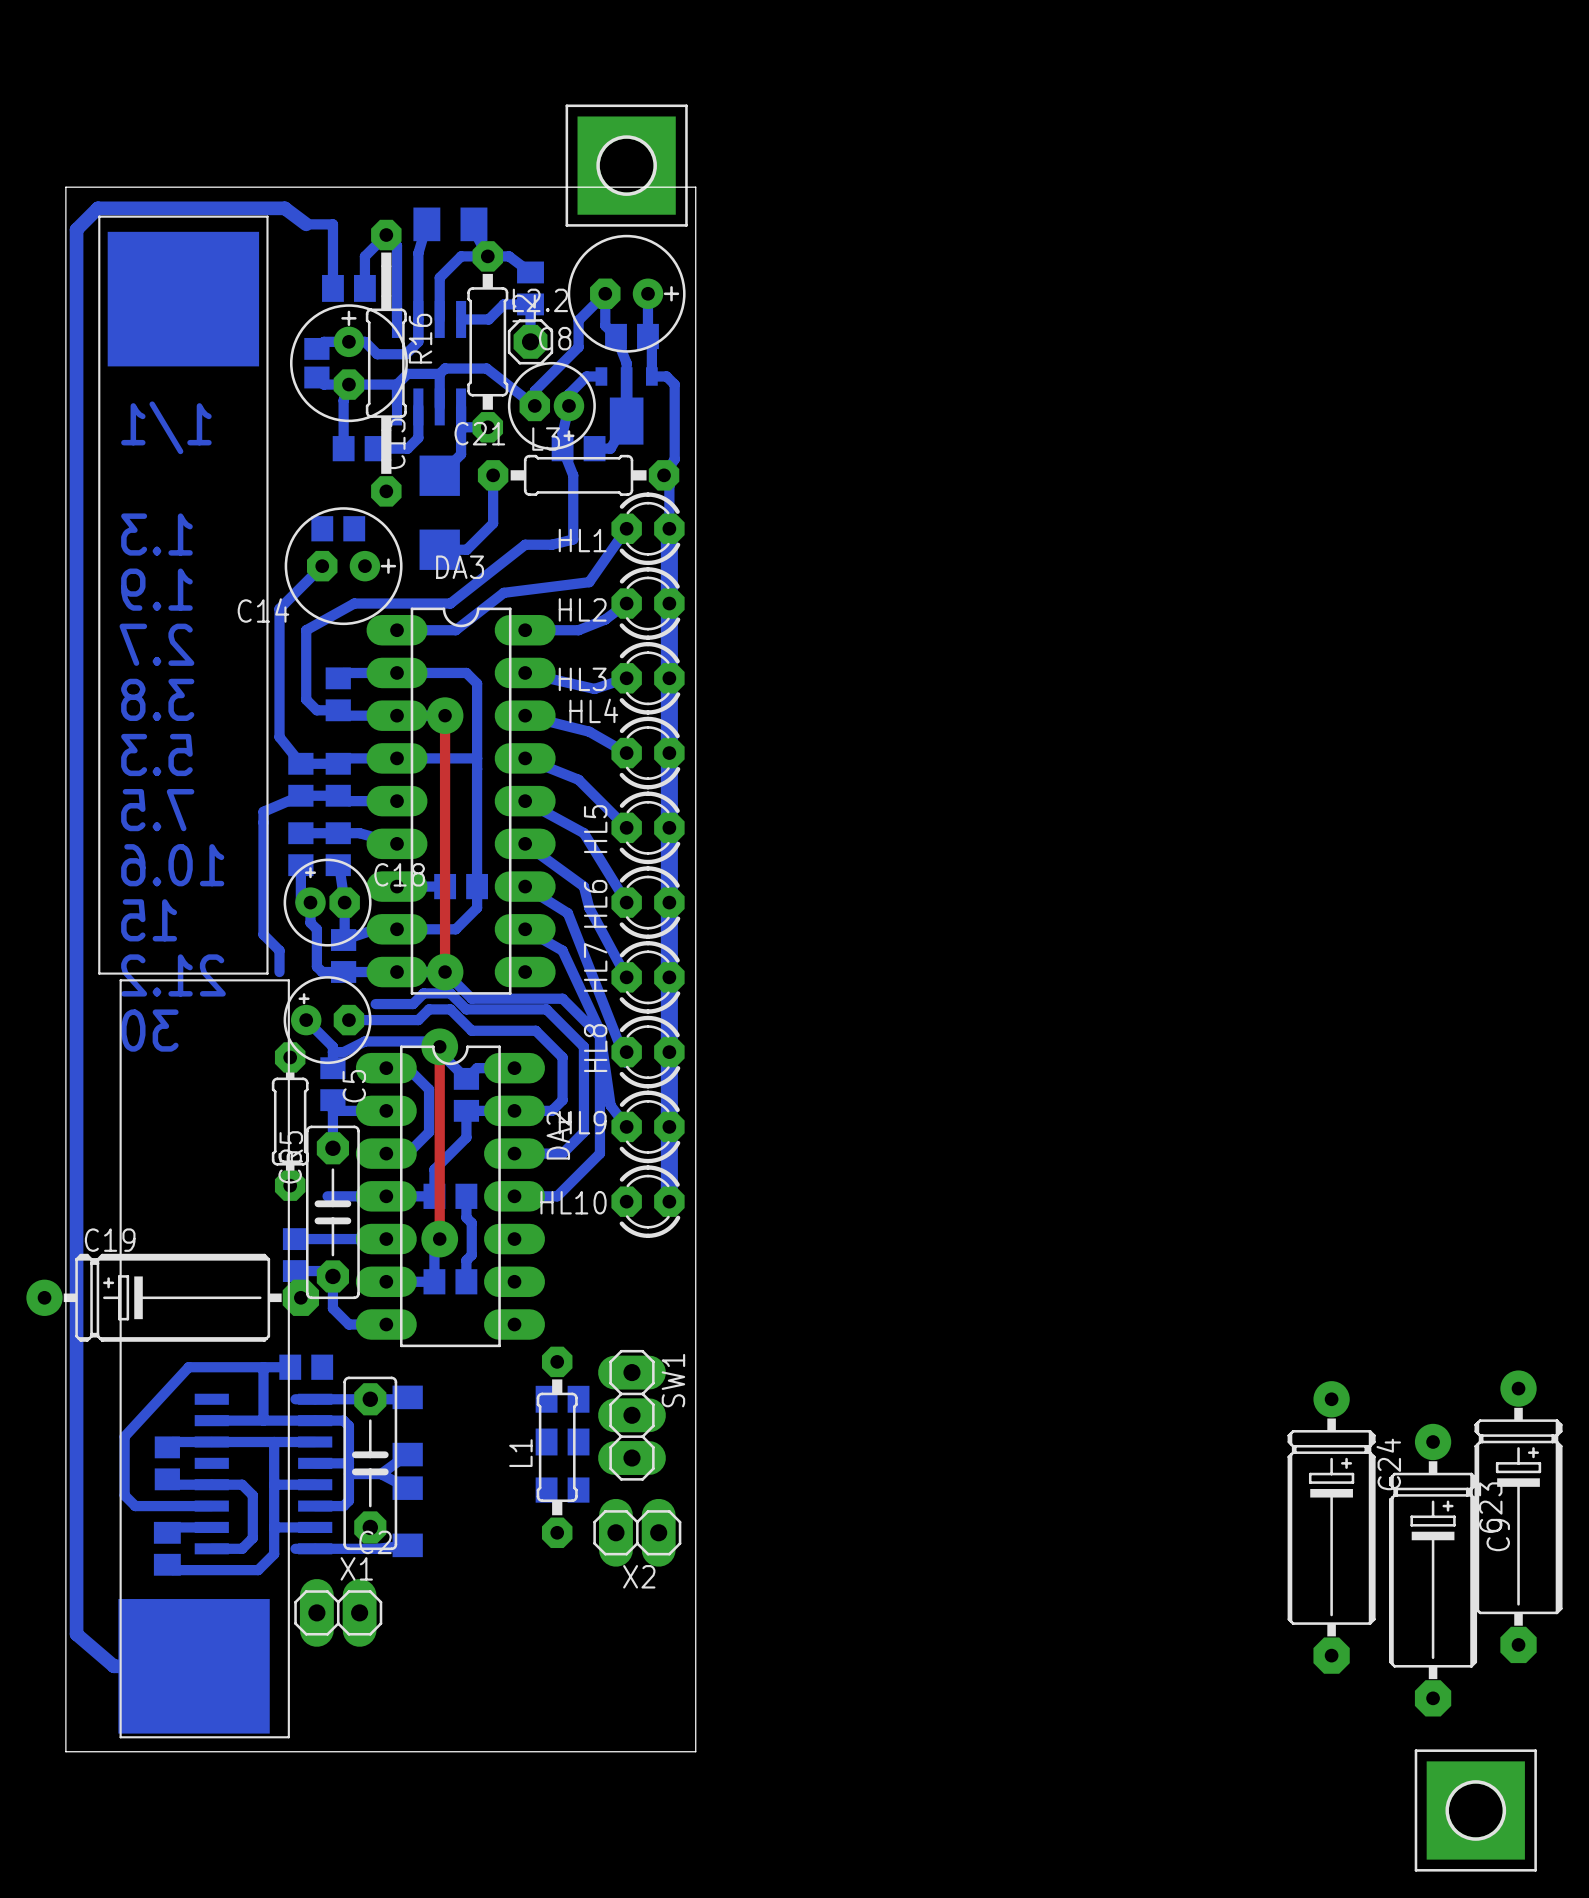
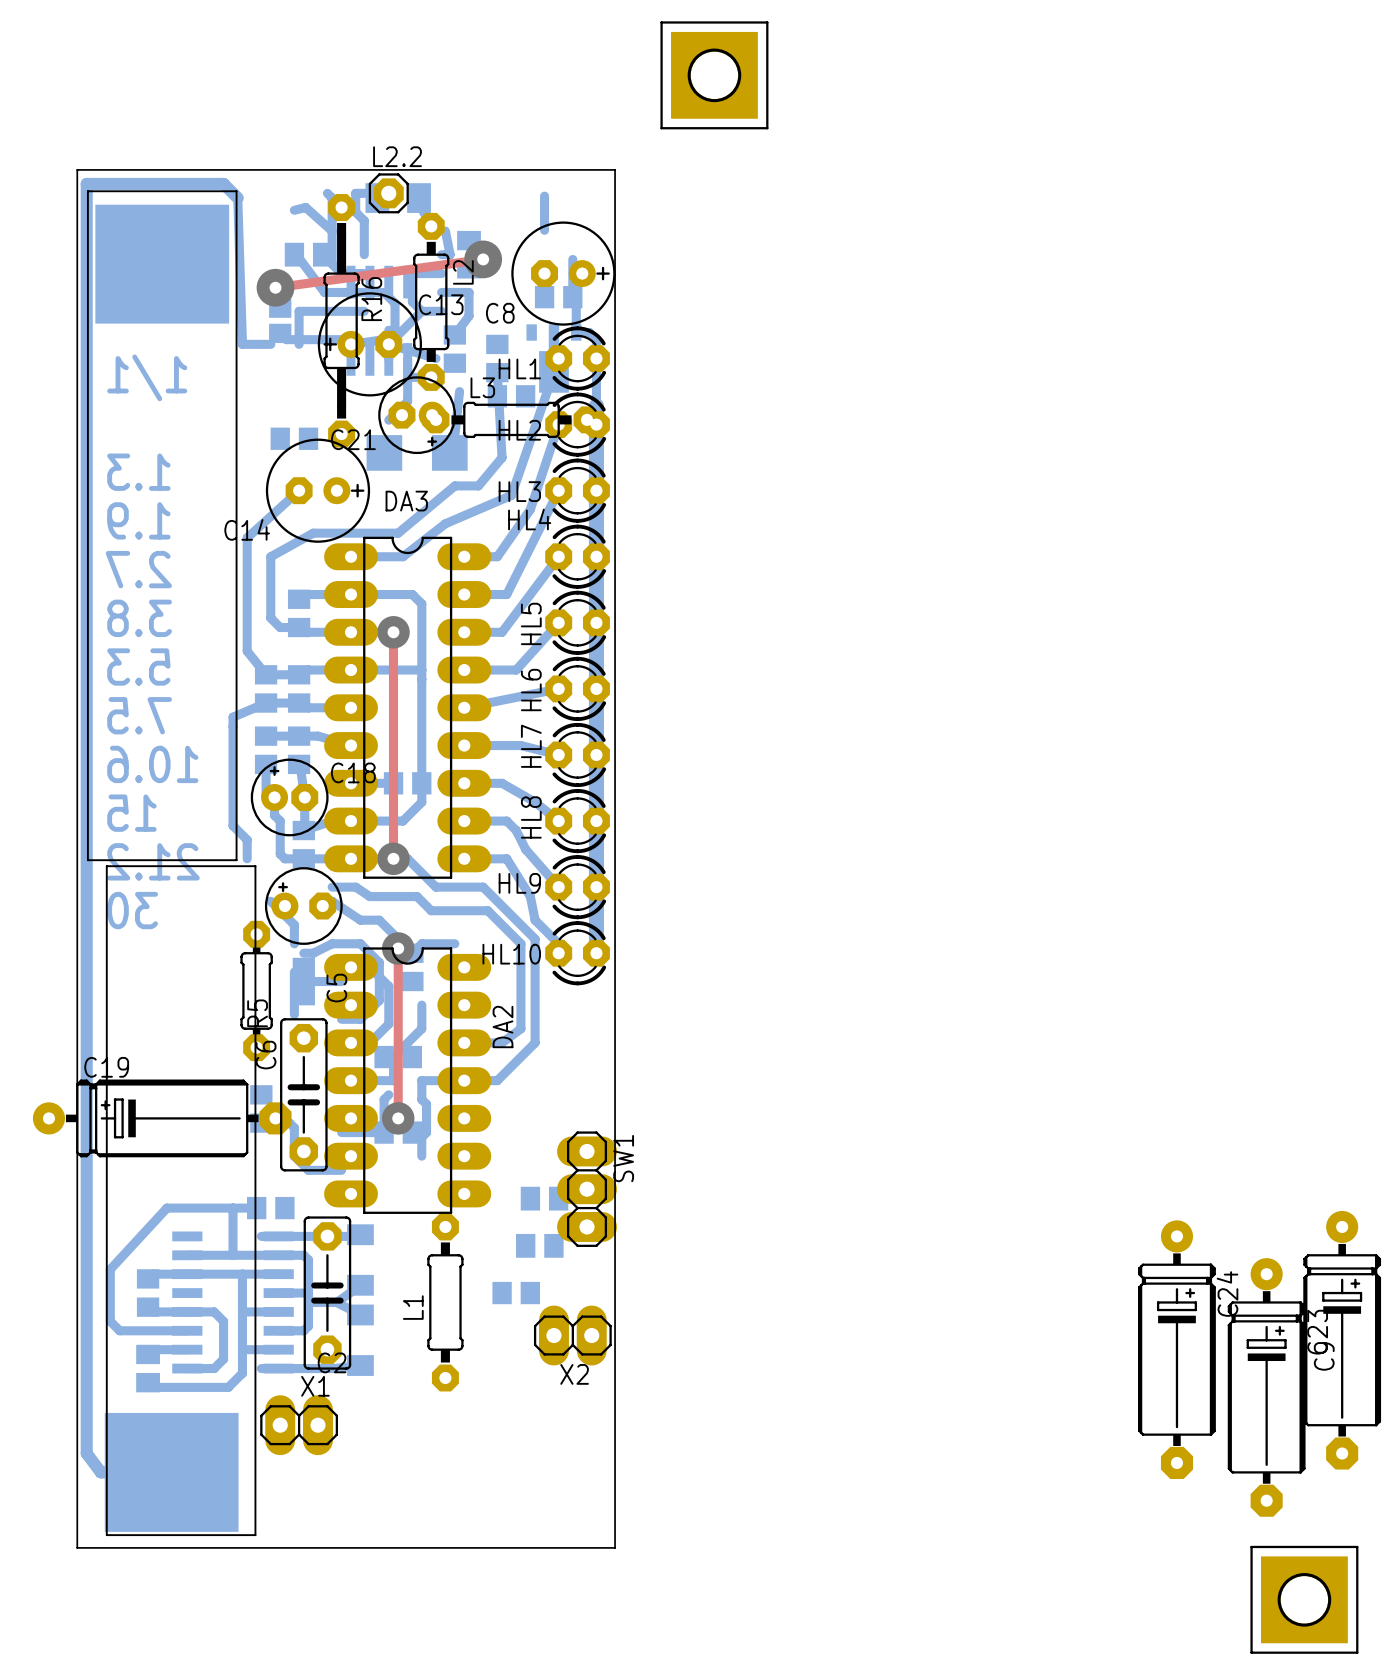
part position: (626, 165) -> (714, 75)
board edge: (695, 192) (695, 187) (65, 187) (65, 1751) (87, 1751) -> (615, 169) (77, 169) (77, 1547)
bottom track: (97, 208) (76, 229) (76, 1634) (113, 1666) -> (86, 183) (86, 1453) (100, 1472)
bottom track: (252, 208) (284, 208) (306, 224) (332, 224) (332, 288) -> (223, 183) (237, 198) (242, 344) (270, 344)
bottom track: none -> (327, 193) (332, 198) (332, 264) (341, 273) (364, 273)
bottom track: none -> (388, 193) (355, 193) (355, 212) (364, 220) (364, 254)
bottom track: none -> (544, 196) (544, 230)
bottom track: (426, 224) (418, 253) (418, 341) (405, 354) (377, 354) (364, 341) (323, 341) (316, 348) -> none
bottom track: none -> (294, 210) (305, 207) (332, 231)
bottom track: none -> (445, 231) (450, 254) (441, 254)
bottom track: (530, 272) (509, 256) (461, 256) (439, 277) (439, 319) -> none
bottom track: none -> (294, 251) (324, 292) (384, 292) (395, 303) (395, 328) (384, 339) (351, 344)
bottom track: (364, 288) (364, 256) (386, 235) (397, 245) (397, 319) -> none
top track: none -> (483, 259) (275, 287)
via: none -> (483, 259)
C8 position: (626, 293) -> (563, 273)
bottom track: none -> (441, 273) (412, 273) (412, 301) (421, 311)
bottom track: (461, 319) (488, 319) (503, 304) (530, 304) (530, 331) -> (441, 292) (469, 292)
via: none -> (275, 287)
bottom track: none -> (469, 301) (469, 316) (454, 334)
L2.2 position: (530, 341) -> (388, 193)
bottom track: none -> (364, 311) (299, 311) (299, 344)
bottom track: none -> (421, 311) (441, 311)
bottom track: none -> (421, 311) (388, 344) (435, 358)
C13 rotation: 0° (348, 363) -> 90° counterclockwise (369, 344)
C13 position: (348, 363) -> (369, 344)
bottom track: (601, 376) (586, 376) (568, 394) (568, 405) (562, 433) (562, 448) (573, 475) (573, 539) (551, 544) (525, 544) (450, 603) -> (497, 372) (502, 457) (478, 485) (454, 485) (398, 533)
bottom track: (348, 384) (343, 400) (343, 448) -> none
part: none -> (454, 349)
C21 position: (551, 405) -> (417, 415)
part: none -> (497, 358)
bottom track: (397, 406) (397, 384) (407, 373) (439, 373) (445, 368) (486, 368) (534, 405) (534, 390) (578, 347) (578, 320) (605, 293) (605, 325) (616, 336) (626, 363) (626, 421) (610, 448) (594, 448) -> none
bottom track: (418, 406) (418, 437) (407, 448) (375, 448) -> none
bottom track: none -> (459, 391) (454, 438) (449, 452)
part: (359, 448) -> none
bottom track: (674, 459) (664, 475) (669, 486) (669, 1201) -> (596, 405) (596, 953)
bottom track: (493, 475) (493, 523) (466, 549) (439, 549) -> none
part: none -> (294, 438)
part rotation: 0° (439, 512) -> 90° clockwise (417, 452)
part: (338, 528) -> none
bottom track: (626, 528) (589, 582) (503, 592) -> (558, 358) (511, 495) (445, 523)
HL1 position: (648, 528) -> (577, 358)
bottom track: (322, 566) (279, 608) -> (299, 490) (247, 537)
C14 position: (343, 566) -> (317, 490)
bottom track: (626, 603) (605, 619) (578, 630) (562, 630) -> (558, 424) (530, 509) (497, 556)
HL2 position: (648, 603) -> (577, 424)
bottom track: (525, 672) (594, 688) (626, 678) -> (464, 594) (506, 594) (558, 490)
HL3 position: (648, 678) -> (577, 490)
bottom track: (525, 715) (589, 731) (626, 753) -> (464, 632) (502, 632) (558, 556)
HL4 position: (648, 753) -> (577, 556)
bottom track: (525, 758) (578, 779) (626, 827) -> (464, 670) (516, 670) (558, 622)
bottom track: (525, 801) (583, 833) (626, 902) -> (464, 707) (558, 688)
HL5 position: (648, 827) -> (577, 622)
bottom track: (525, 843) (583, 886) (589, 907) (626, 977) -> (464, 745) (520, 745) (558, 754)
bottom track: (525, 886) (567, 913) (626, 1062) (626, 1052) -> (464, 783) (502, 783) (535, 802) (558, 821)
HL6 position: (648, 902) -> (577, 688)
bottom track: (525, 929) (562, 950) (599, 1030) (610, 1105) (626, 1126) -> (464, 821) (506, 821) (516, 830) (525, 849) (558, 887)
bottom track: (445, 972) (471, 998) (562, 998) (599, 1036) (599, 1153) (557, 1196) (514, 1196) -> (393, 858) (407, 858) (435, 887) (483, 887) (535, 939) (535, 1042) (497, 1080) (421, 1080) (421, 1099) (426, 1104) (426, 1132) (421, 1137) (421, 1156)
bottom track: none -> (464, 858) (506, 858) (530, 896) (535, 920) (558, 943) (558, 953)
HL7 position: (648, 977) -> (577, 754)
bottom track: (402, 1004) (413, 1004) (423, 993) (450, 993) (466, 1009) (546, 1009) (583, 1046) (583, 1132) (562, 1153) (514, 1153) -> none
C5 position: (327, 1020) -> (303, 906)
bottom track: (348, 1020) (418, 1020) (429, 1009) (450, 1009) (471, 1030) (487, 1030) -> (355, 887) (369, 896) (417, 896) (431, 910)
bottom track: (535, 1030) (562, 1057) (562, 1100) (551, 1110) (466, 1110) (466, 1137) (434, 1169) (434, 1196) (327, 1196) -> (473, 910) (487, 910) (520, 943) (520, 1028) (502, 1042) (464, 1042)
bottom track: (407, 1041) (364, 1041) (343, 1052) (332, 1052) -> (360, 920) (332, 901) (322, 906)
DA2 footprint: [355, 1045, 545, 1348] -> [324, 947, 492, 1214]
top track: (439, 1046) (439, 1239) -> (398, 948) (398, 1118)
via position: (439, 1046) -> (398, 948)
HL8 position: (648, 1052) -> (577, 821)
bottom track: none -> (341, 943) (332, 943) (313, 953) (303, 953)
part position: (332, 1084) -> (303, 981)
C5 name position: C5 (354, 1086) -> C5 (336, 988)
bottom track: none -> (351, 967) (369, 967) (388, 986) (388, 1024) (369, 1042) (351, 1042)
HL9 position: (648, 1126) -> (577, 887)
bottom track: none -> (421, 1005) (421, 1028) (393, 1057) (393, 1080) (351, 1080)
bottom track: (466, 1196) (466, 1217) (471, 1223) (471, 1255) (466, 1260) (466, 1281) -> none
HL10 position: (648, 1201) -> (577, 953)
C6 position: (332, 1212) -> (303, 1094)
bottom track: (295, 1239) (386, 1239) -> none
via position: (439, 1239) -> (398, 1118)
C19 position: (172, 1297) -> (162, 1118)
part: none -> (544, 1198)
part: (562, 1399) -> none
part: none -> (539, 1245)
SW1 position: (631, 1415) -> (587, 1189)
part: (562, 1441) -> none
L1 position: (557, 1447) -> (445, 1302)
part position: (562, 1490) -> (516, 1293)
X2 position: (637, 1532) -> (572, 1335)

